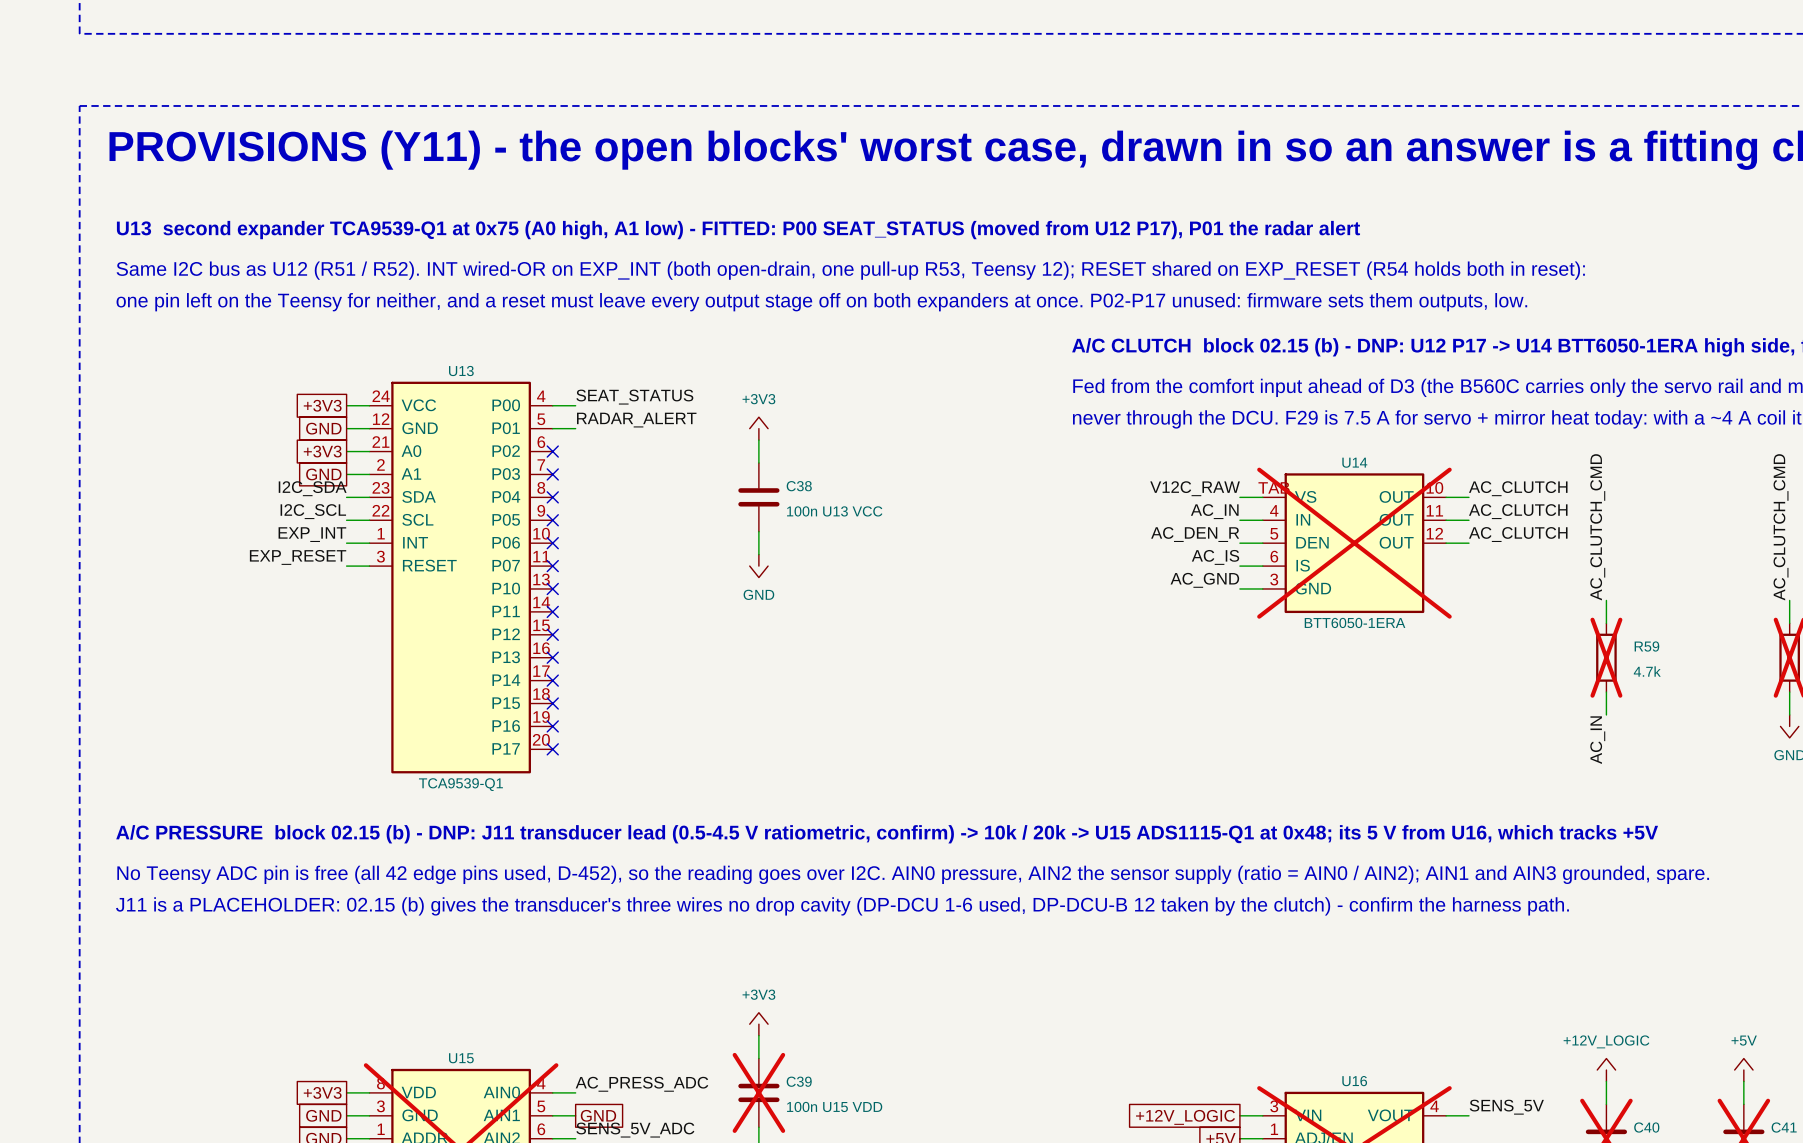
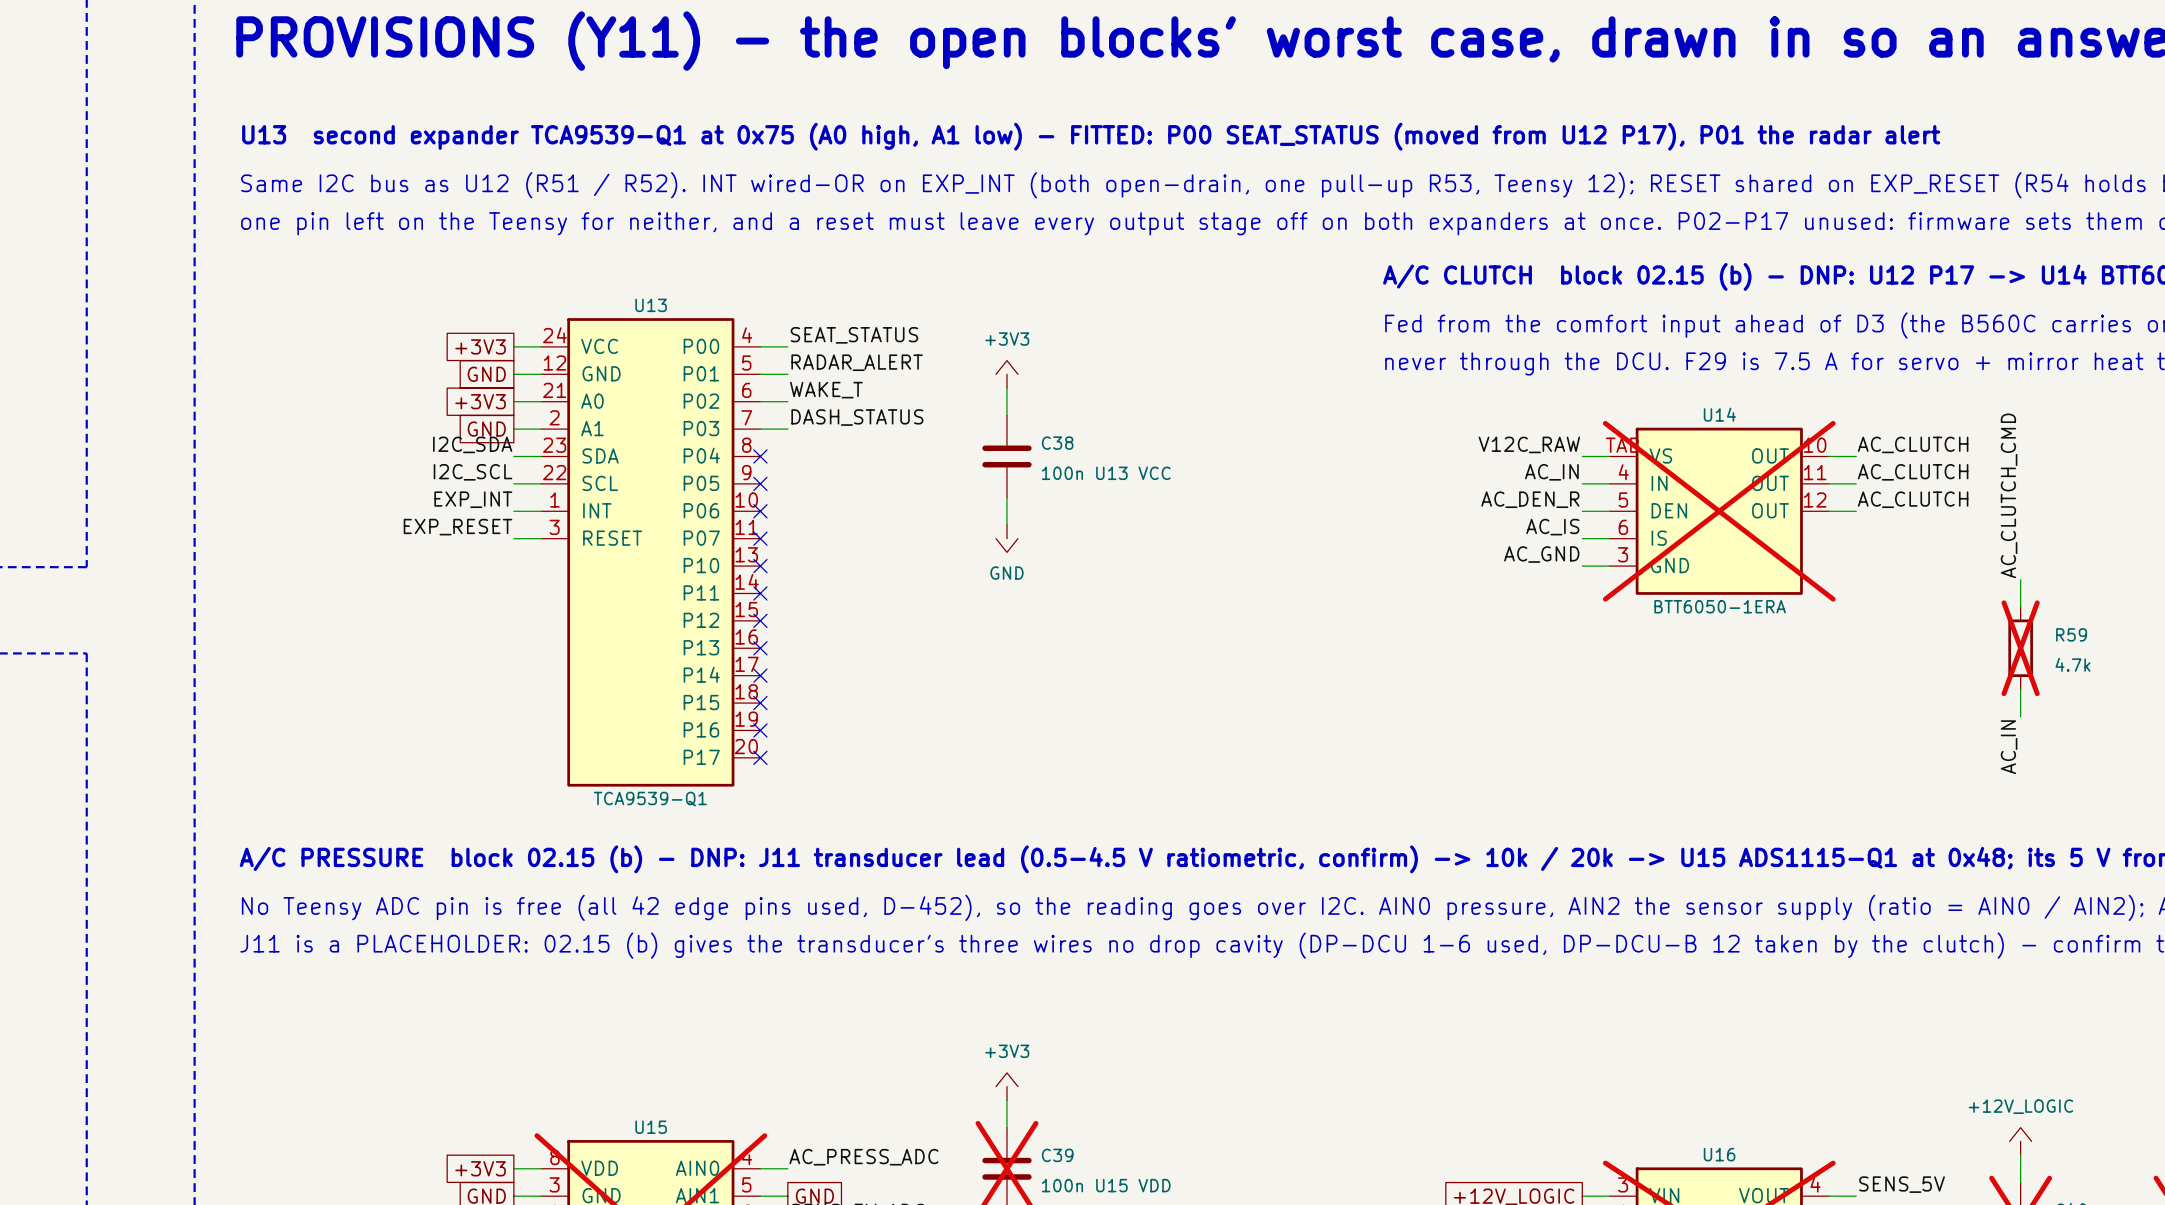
label: none -> WAKE_T (826, 390)
wire: none -> (760, 401) (787, 401)
no-connect mark: (552, 451) -> none
label: none -> DASH_STATUS (857, 417)
wire: none -> (760, 429) (787, 429)
no-connect mark: (552, 474) -> none

